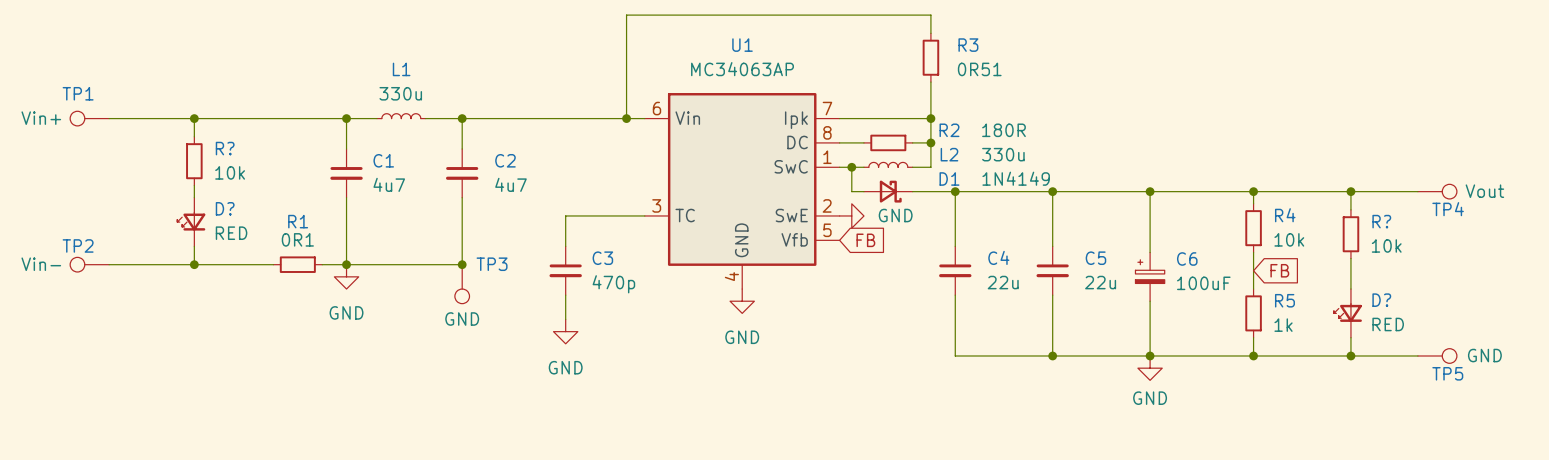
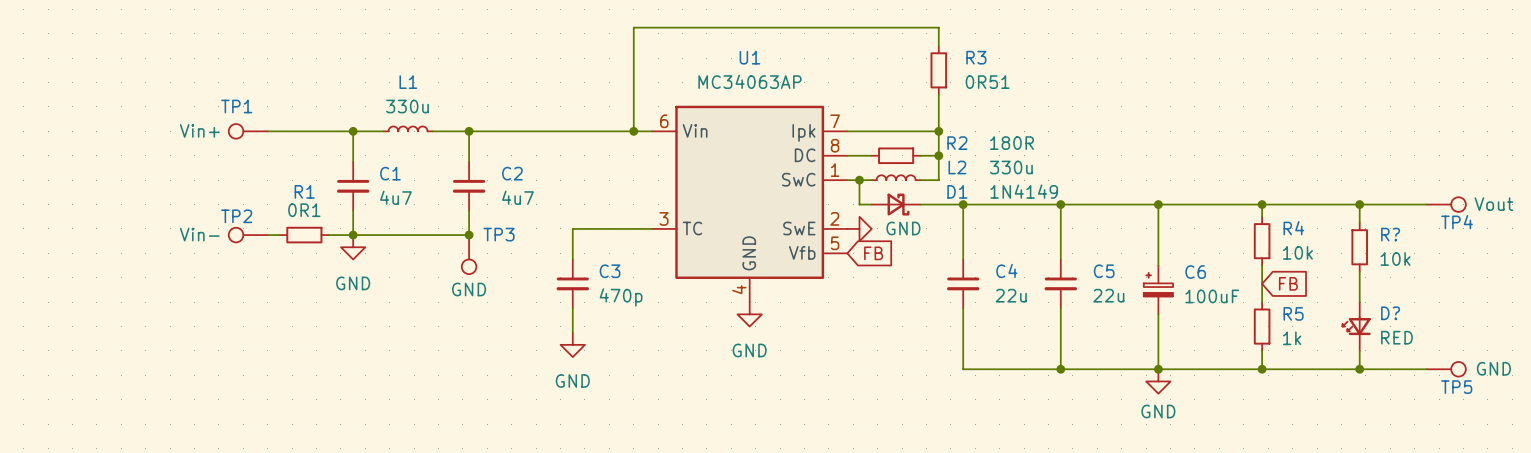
TP1 position: (89, 118) -> (248, 131)
wire: (109, 118) (261, 118) -> none
wire: (194, 118) (194, 136) -> none
junction: (194, 118) -> none
R?: 10k (194, 161) -> none
wire: (194, 185) (194, 197) -> none
D?: RED (191, 222) -> none
wire: none -> (267, 235) (279, 235)
wire: (346, 222) (346, 264) -> none
wire: (462, 222) (462, 264) (322, 264) -> (469, 235) (328, 235)
wire: (194, 246) (194, 264) -> none
TP2 position: (89, 264) -> (248, 235)
wire: (109, 264) (273, 264) -> none
junction: (194, 264) -> none
R1 position: (297, 264) -> (304, 235)
junction position: (346, 264) -> (353, 235)
junction position: (462, 264) -> (469, 235)
power symbol position: GND (346, 276) -> GND (353, 247)
TP3 position: (462, 284) -> (469, 254)

